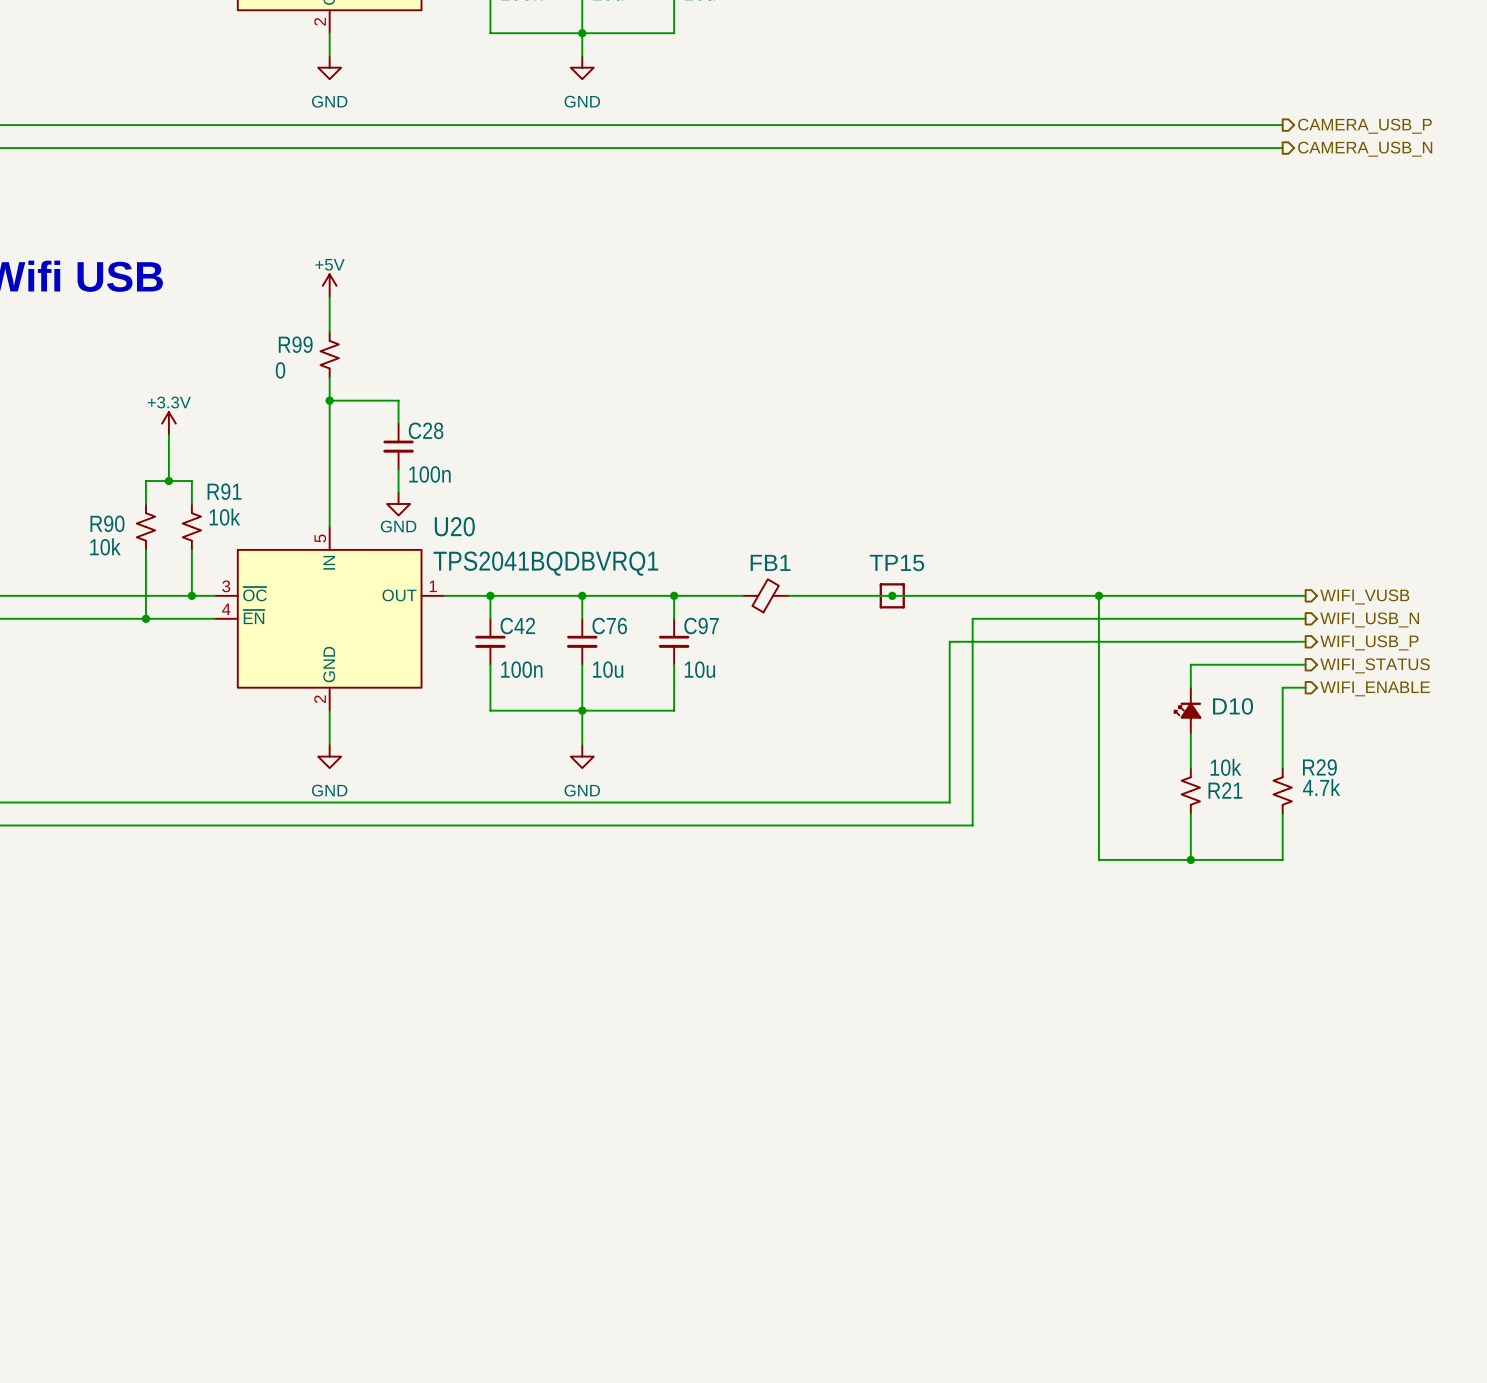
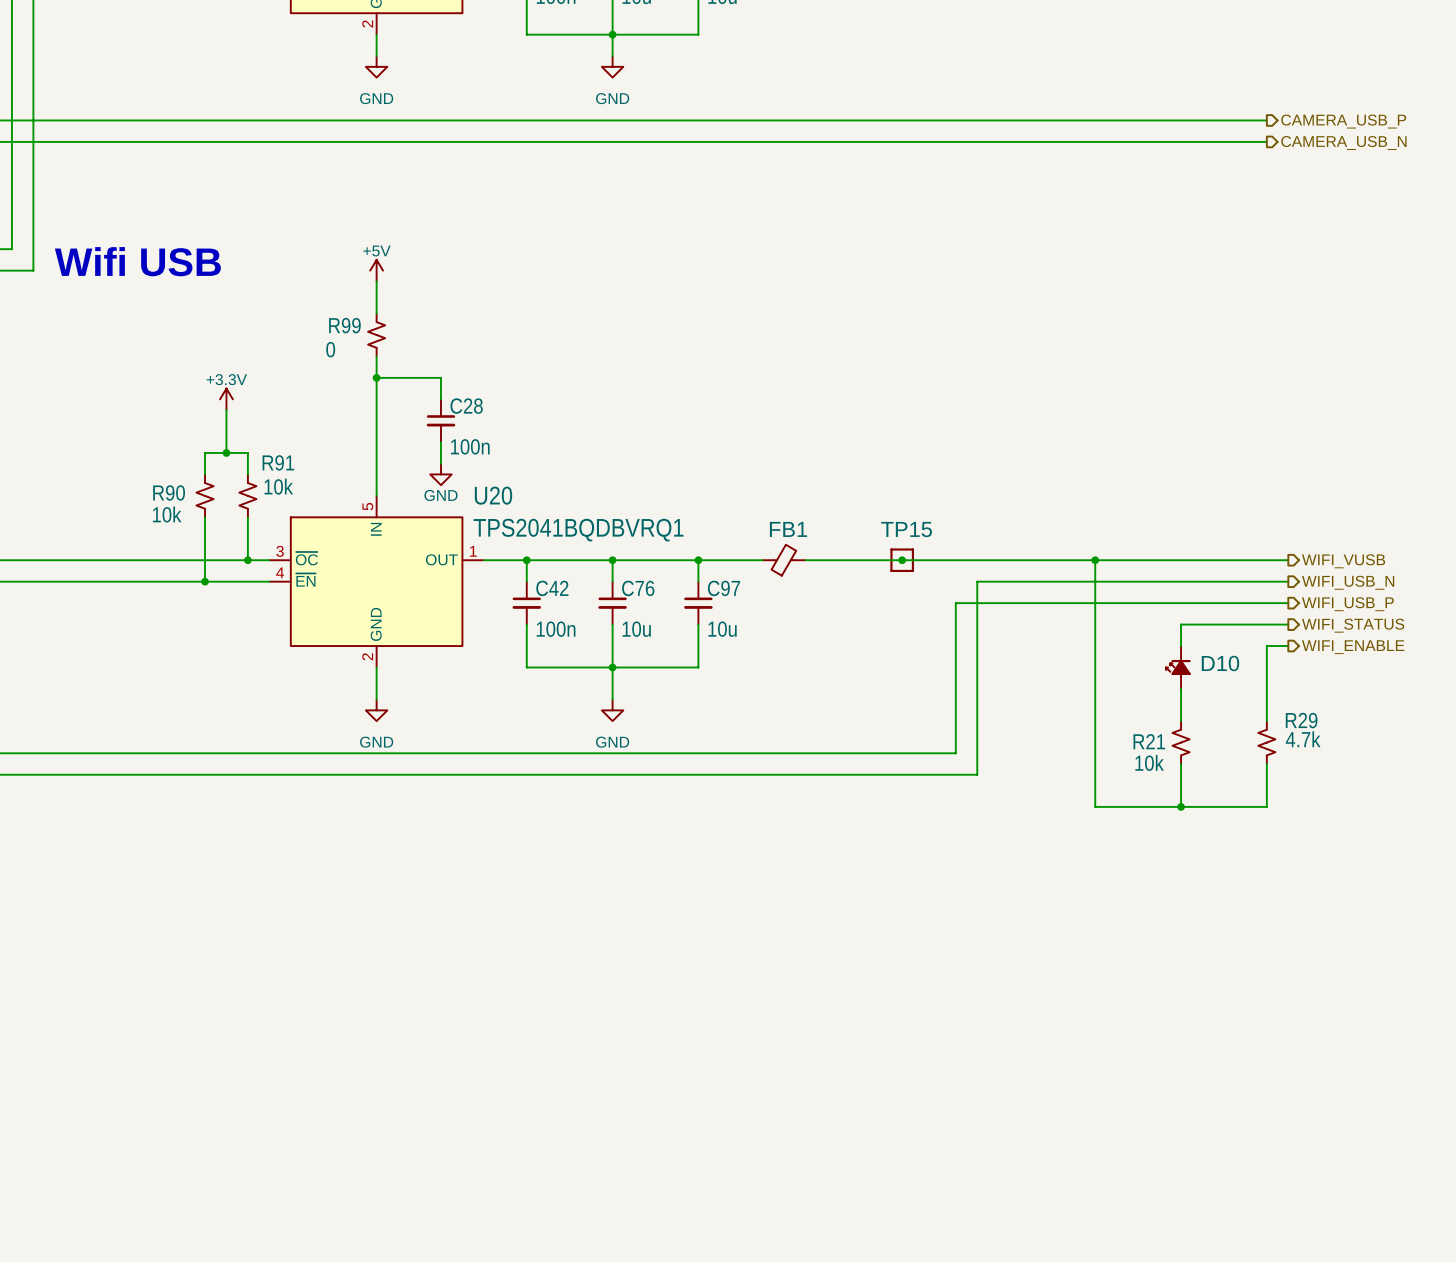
R21 value position: 10k (1225, 767) -> 10k (1149, 762)
R21 name position: R21 (1225, 790) -> R21 (1149, 741)

